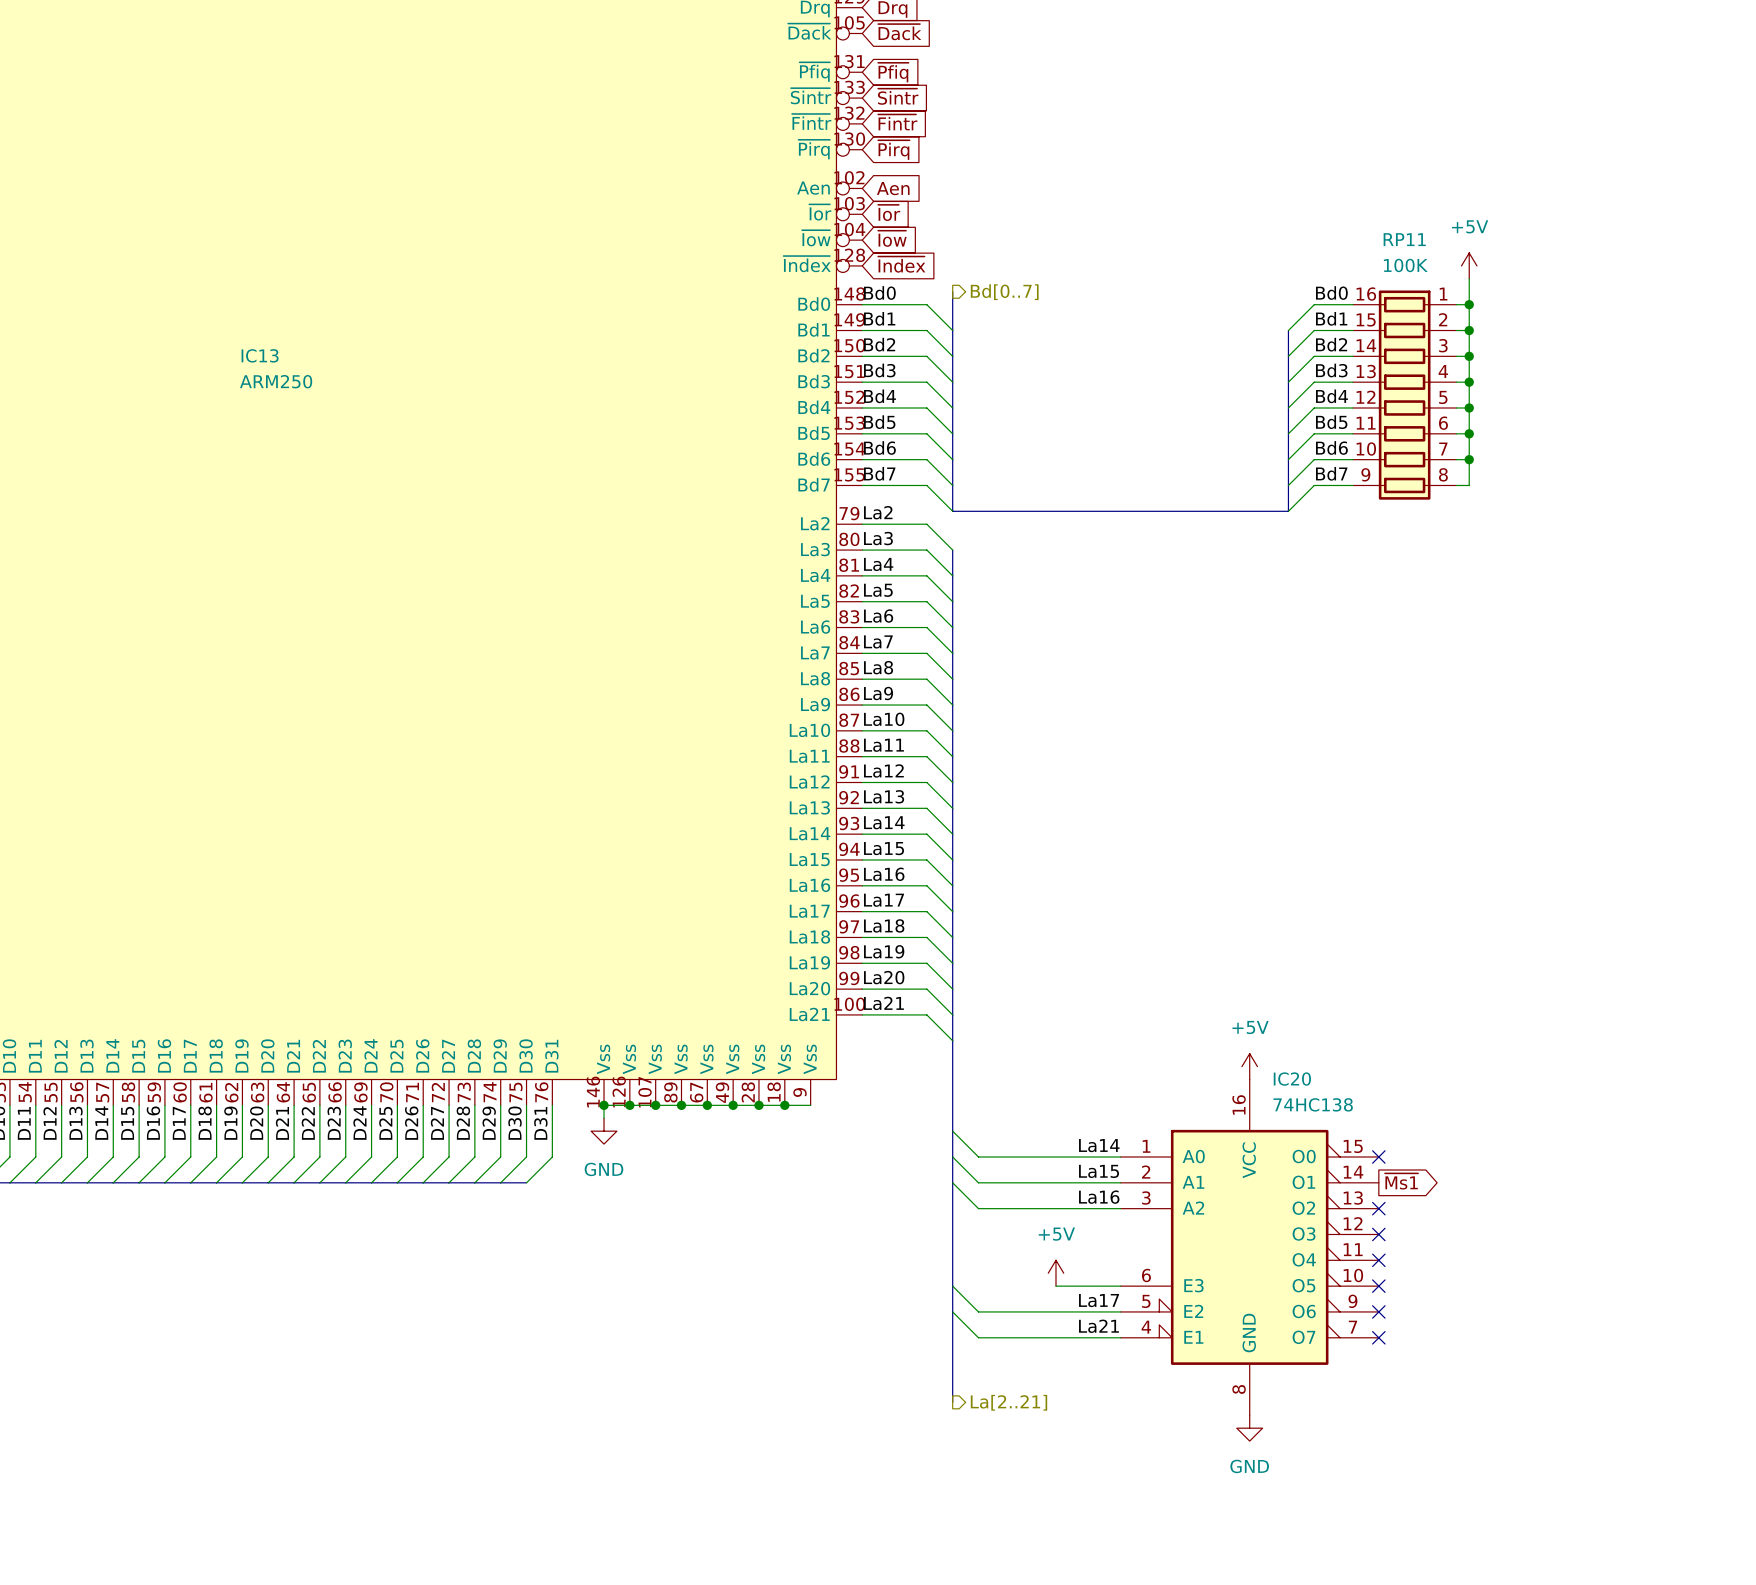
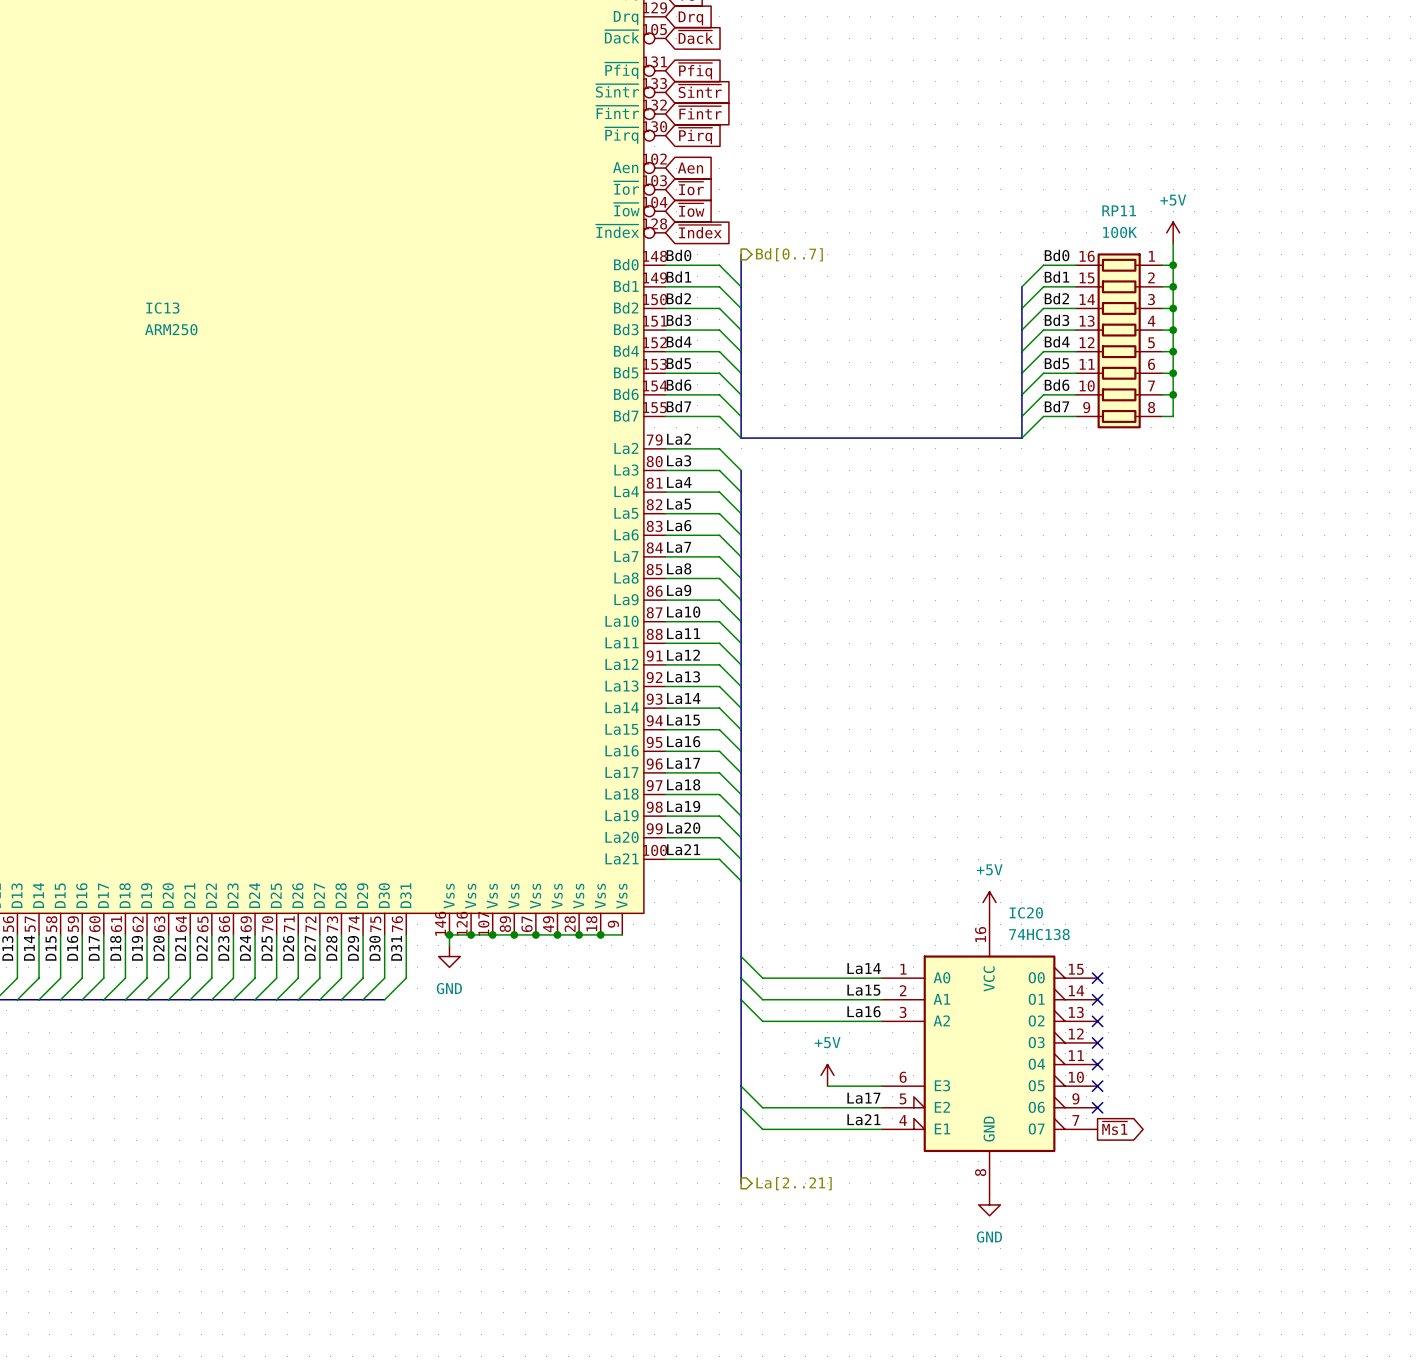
global label position: ~{Ms1} (1401, 1181) -> ~{Ms1} (1114, 1128)
no-connect mark: none -> (1097, 999)
no-connect mark: (1378, 1337) -> none

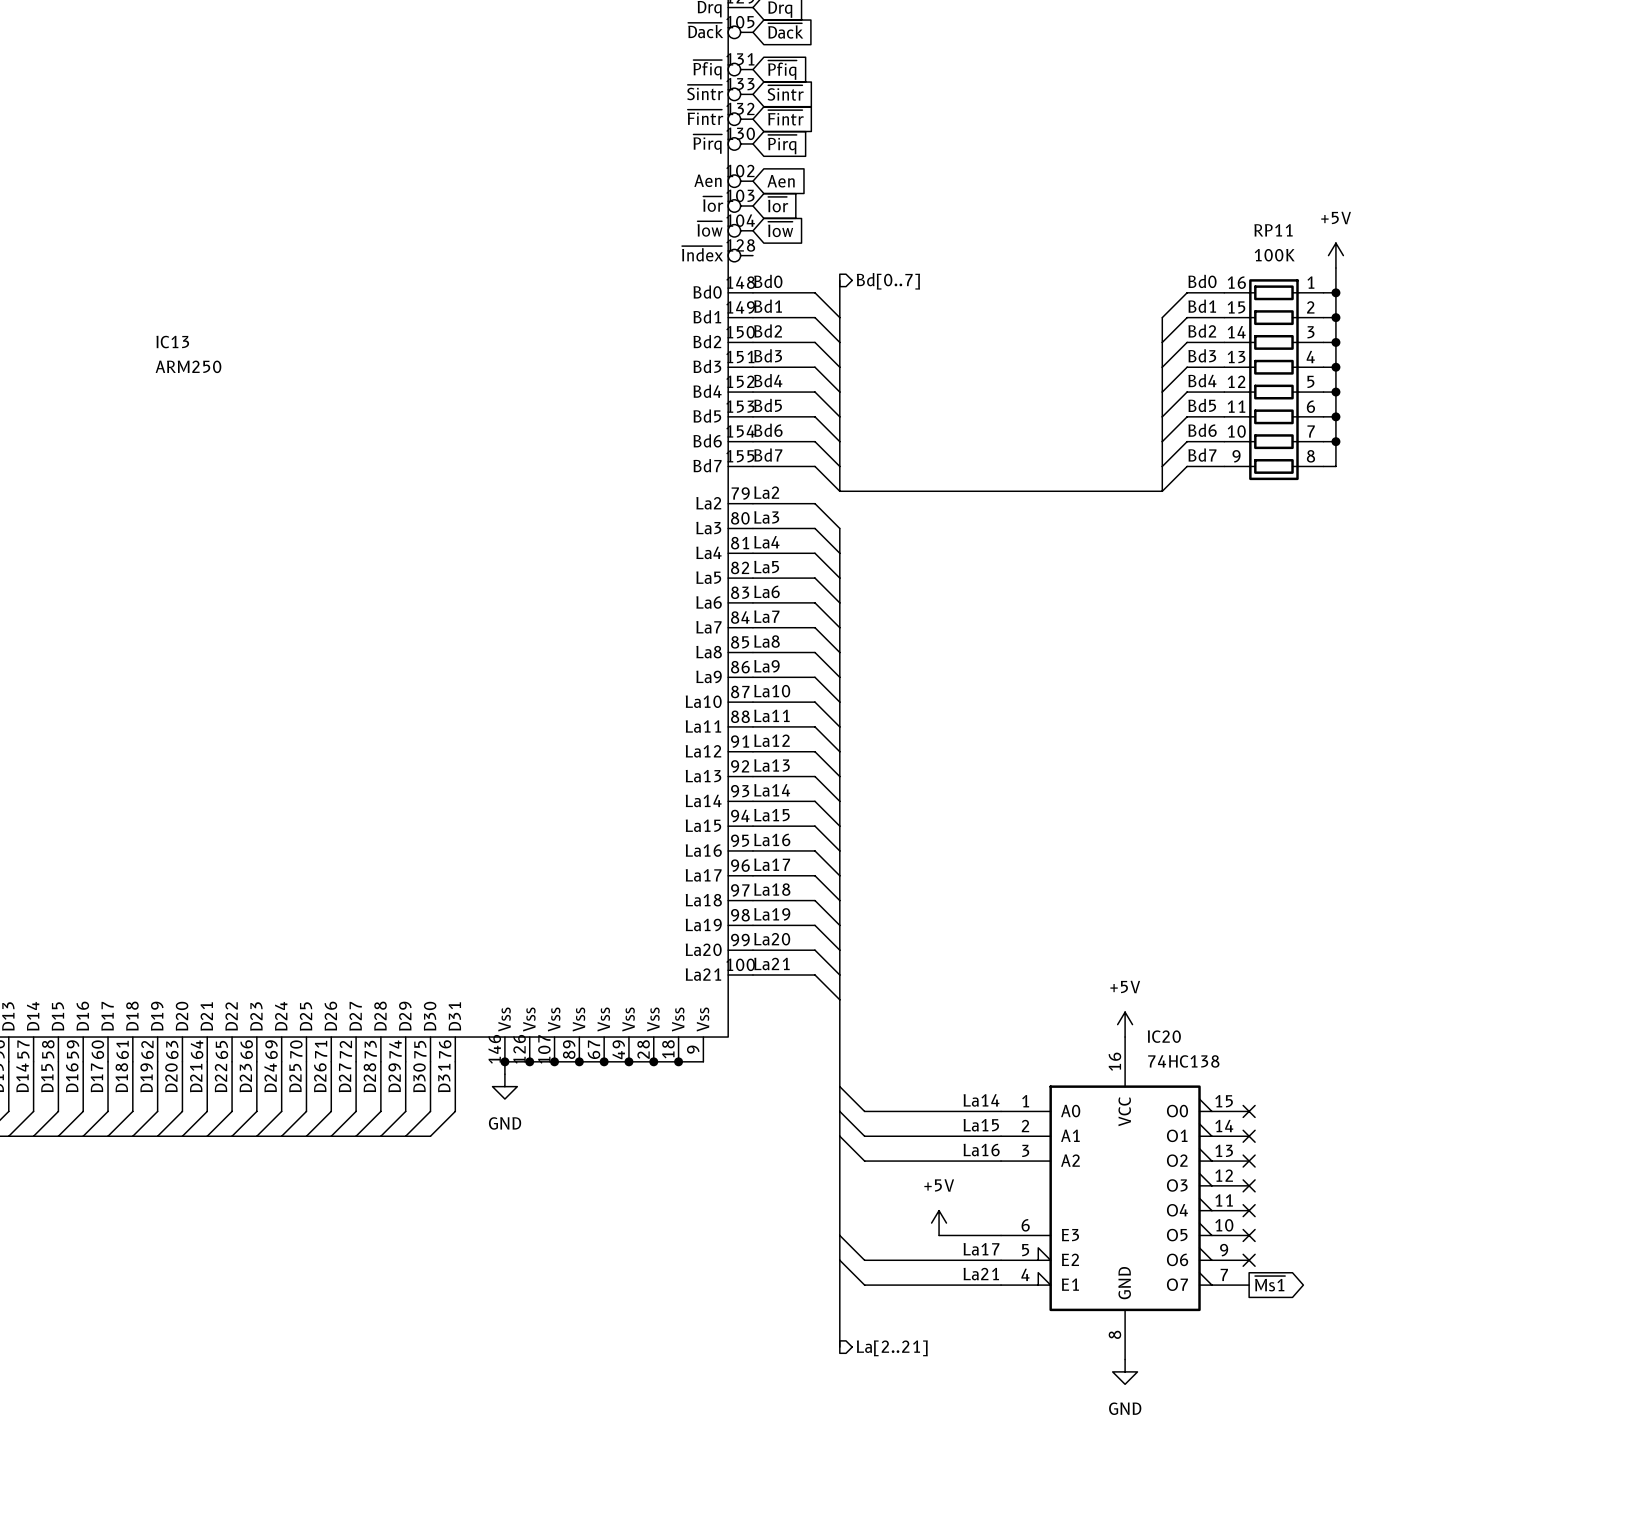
global label: ~{Index} (700, 231) -> none

